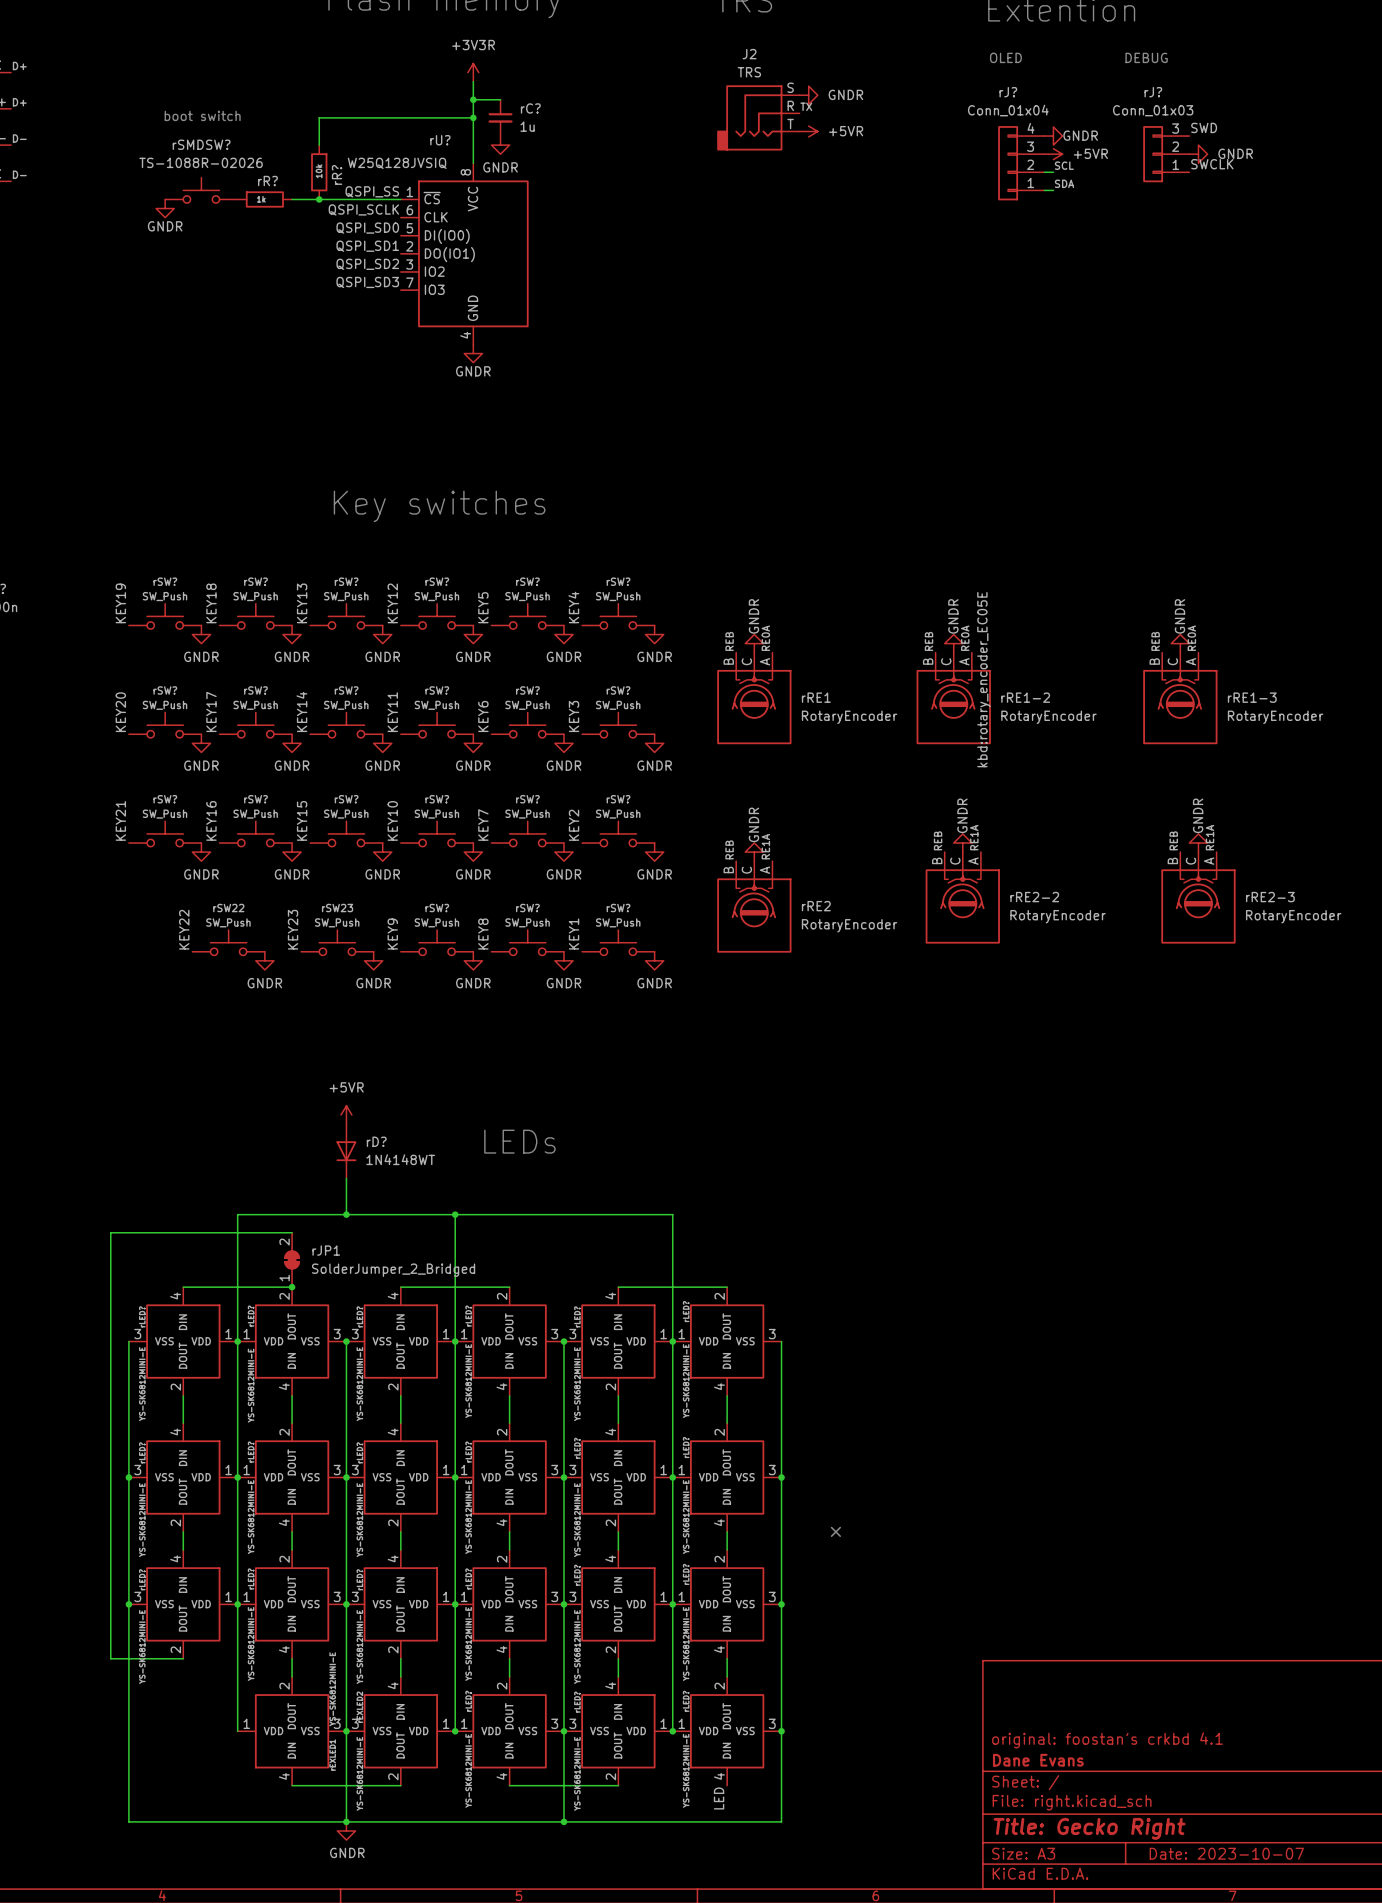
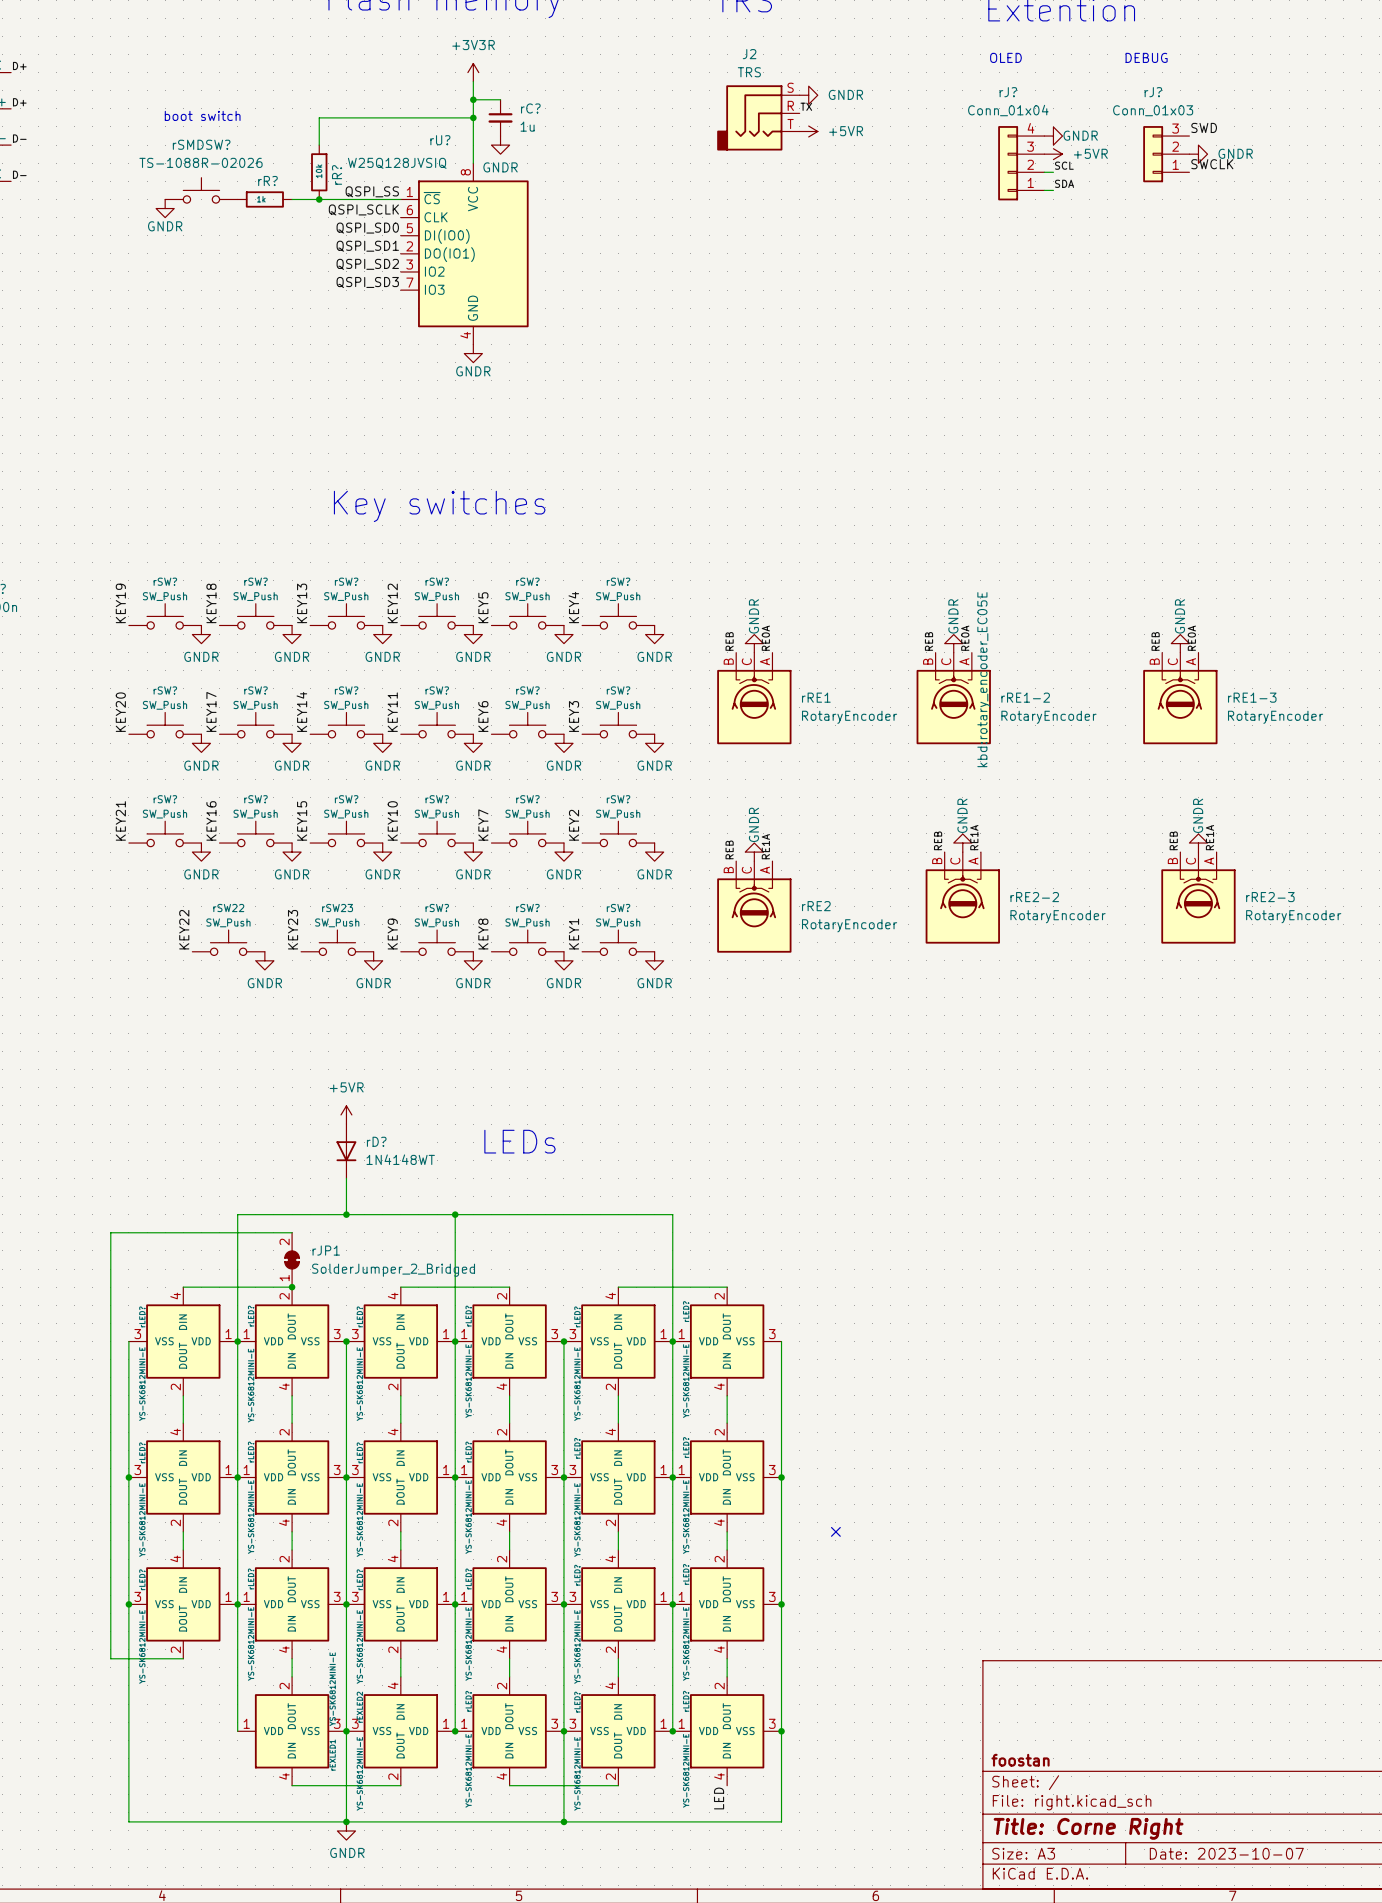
title block: original: foostan's crkbd 4.1 (1107, 1740) -> none
title block: Dane Evans (1038, 1760) -> foostan (1020, 1760)
title block: Title: Gecko Right (1089, 1828) -> Title: Corne Right (1088, 1828)

